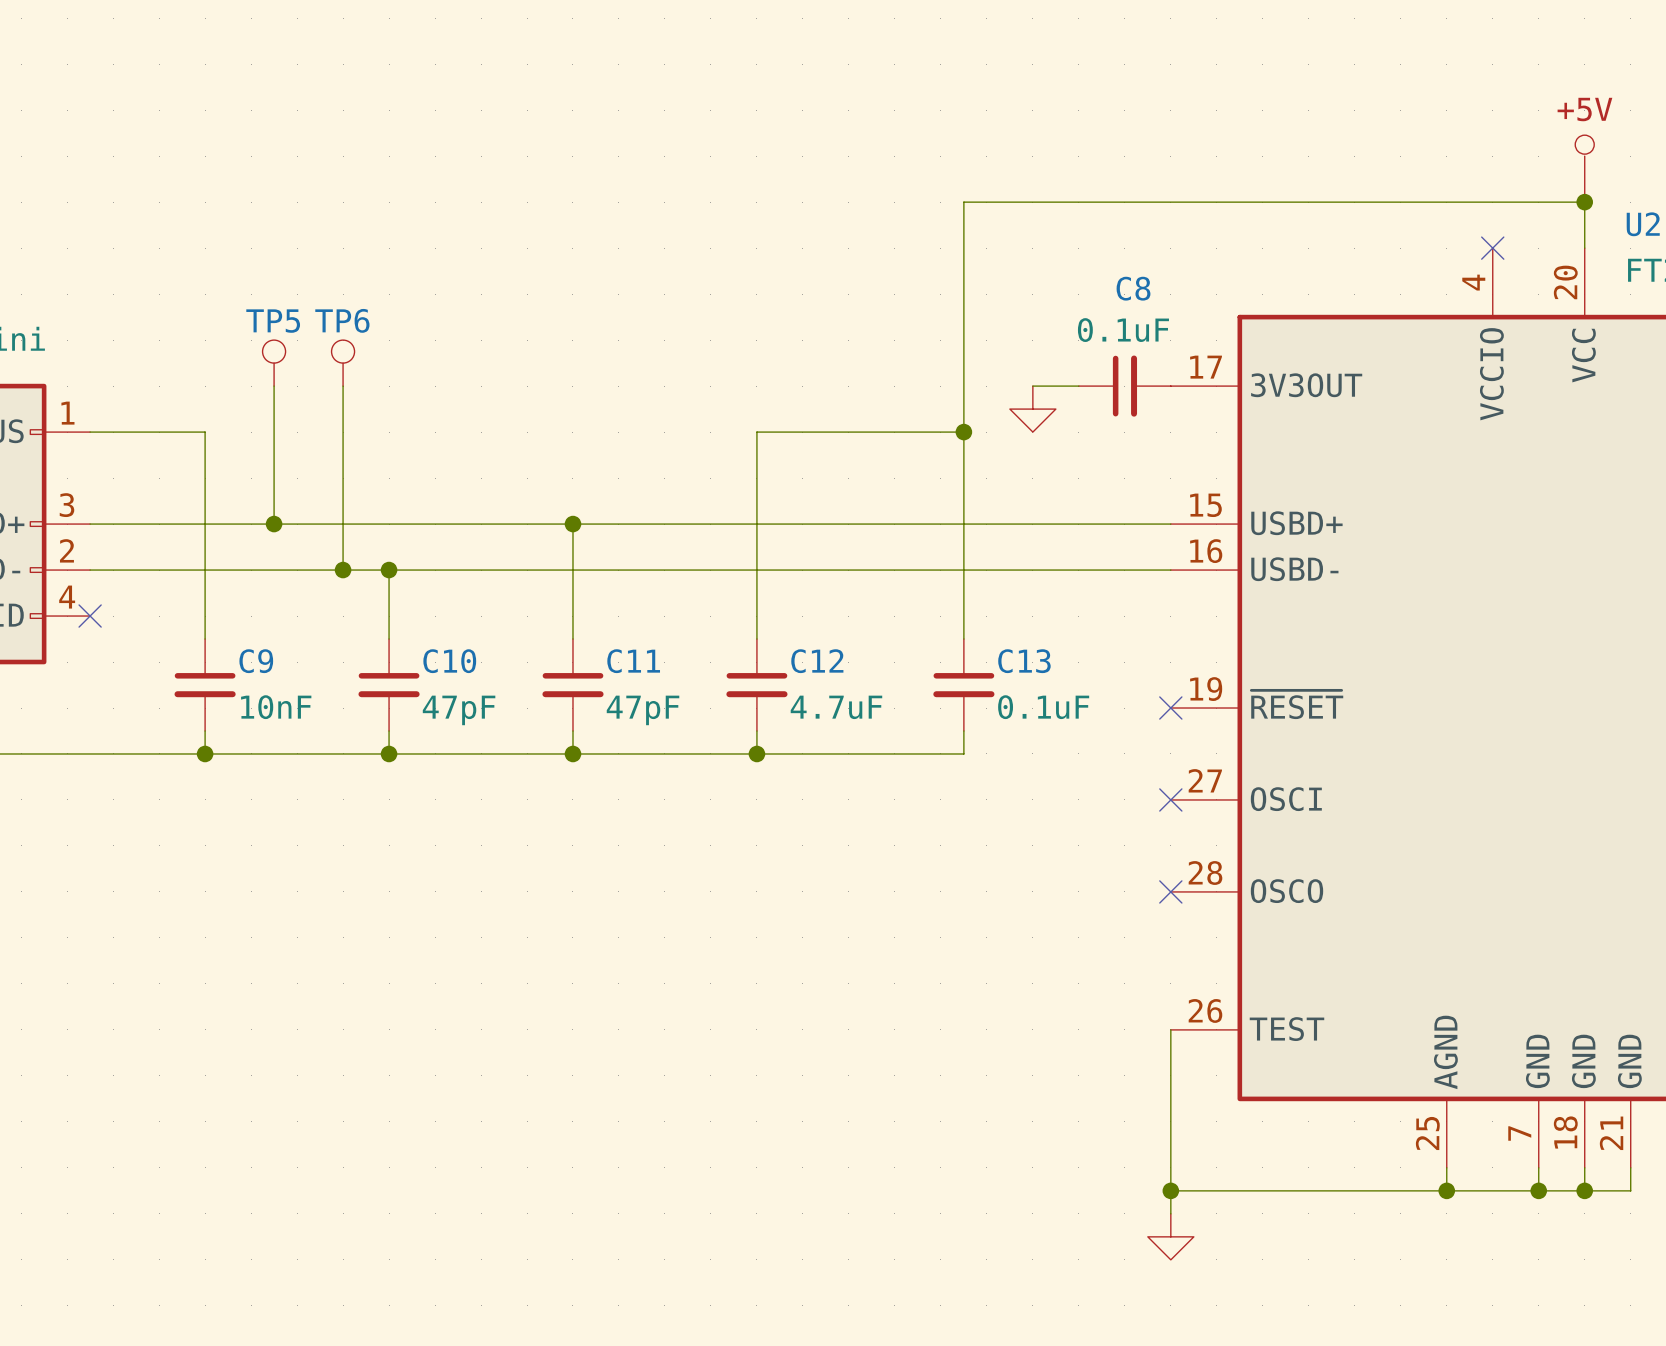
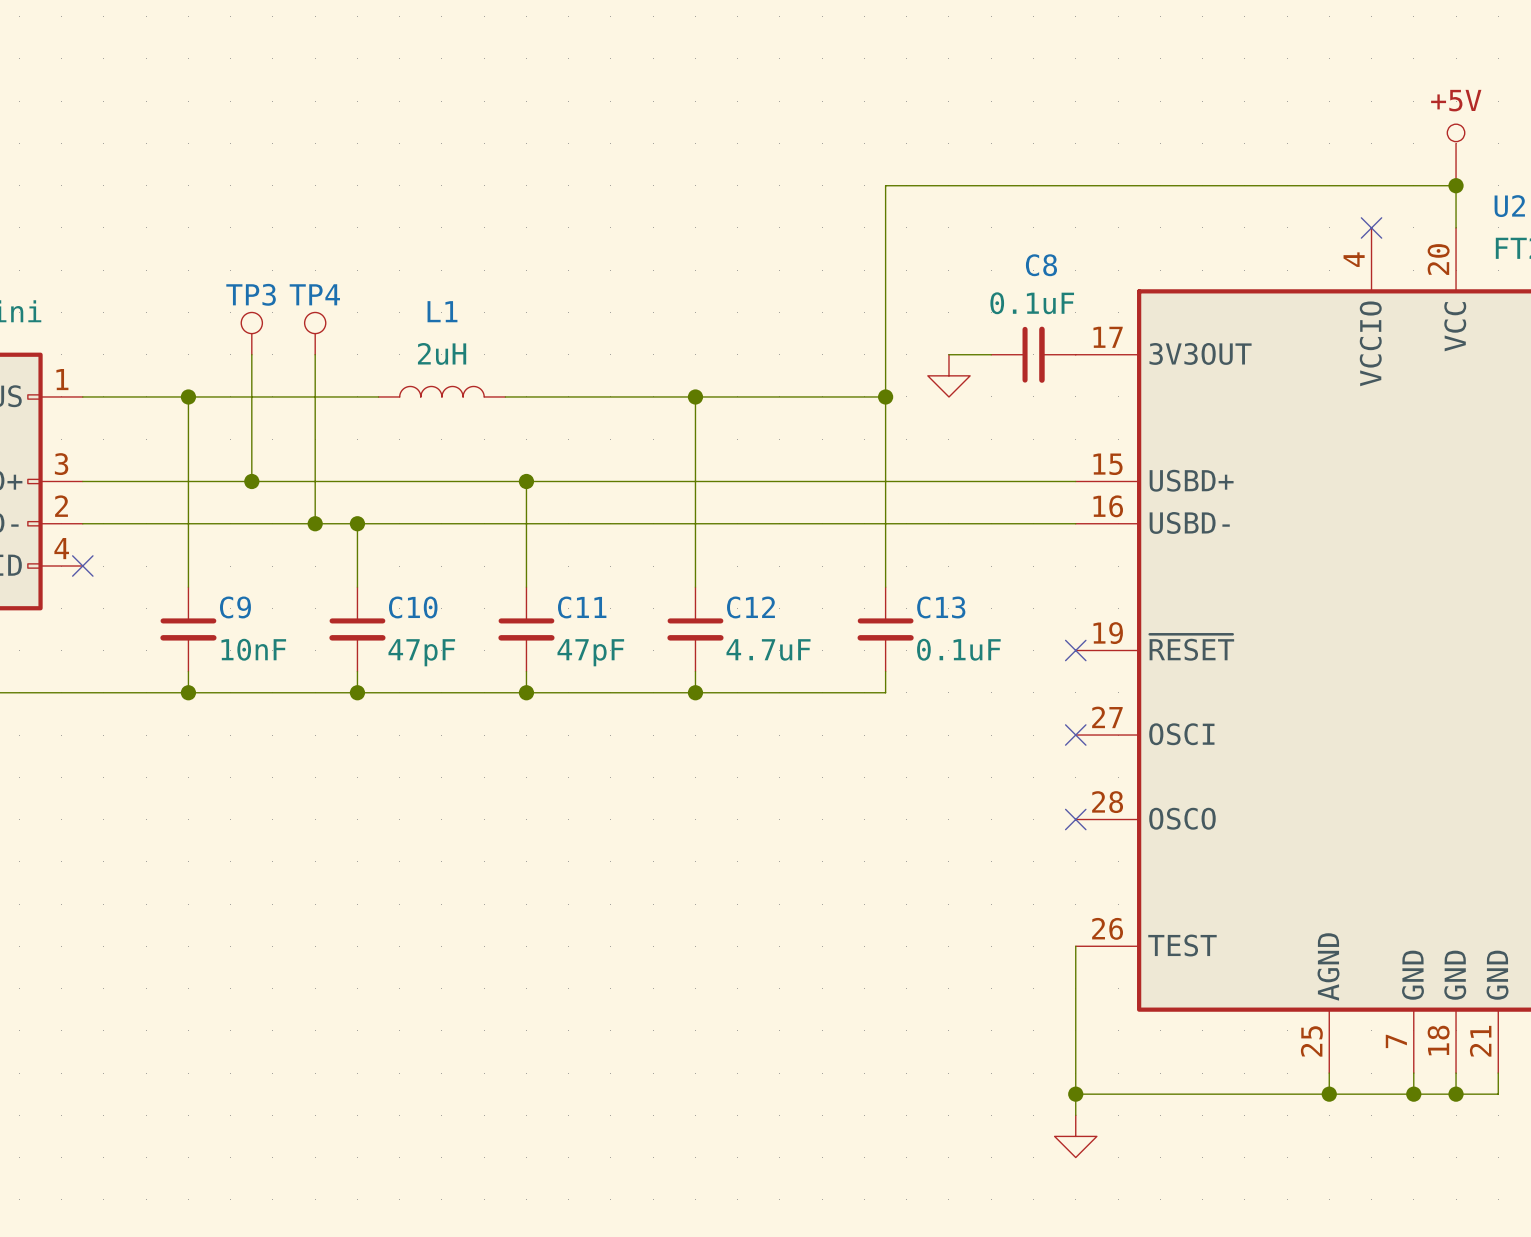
TP6 name: TP6 (342, 320) -> TP4 (314, 294)
TP5 name: TP5 (273, 321) -> TP3 (251, 294)
L1: none -> 2uH (441, 391)
wire: none -> (188, 396) (378, 396)
junction: none -> (188, 396)
wire: none -> (505, 396) (695, 396)
junction: none -> (695, 396)

